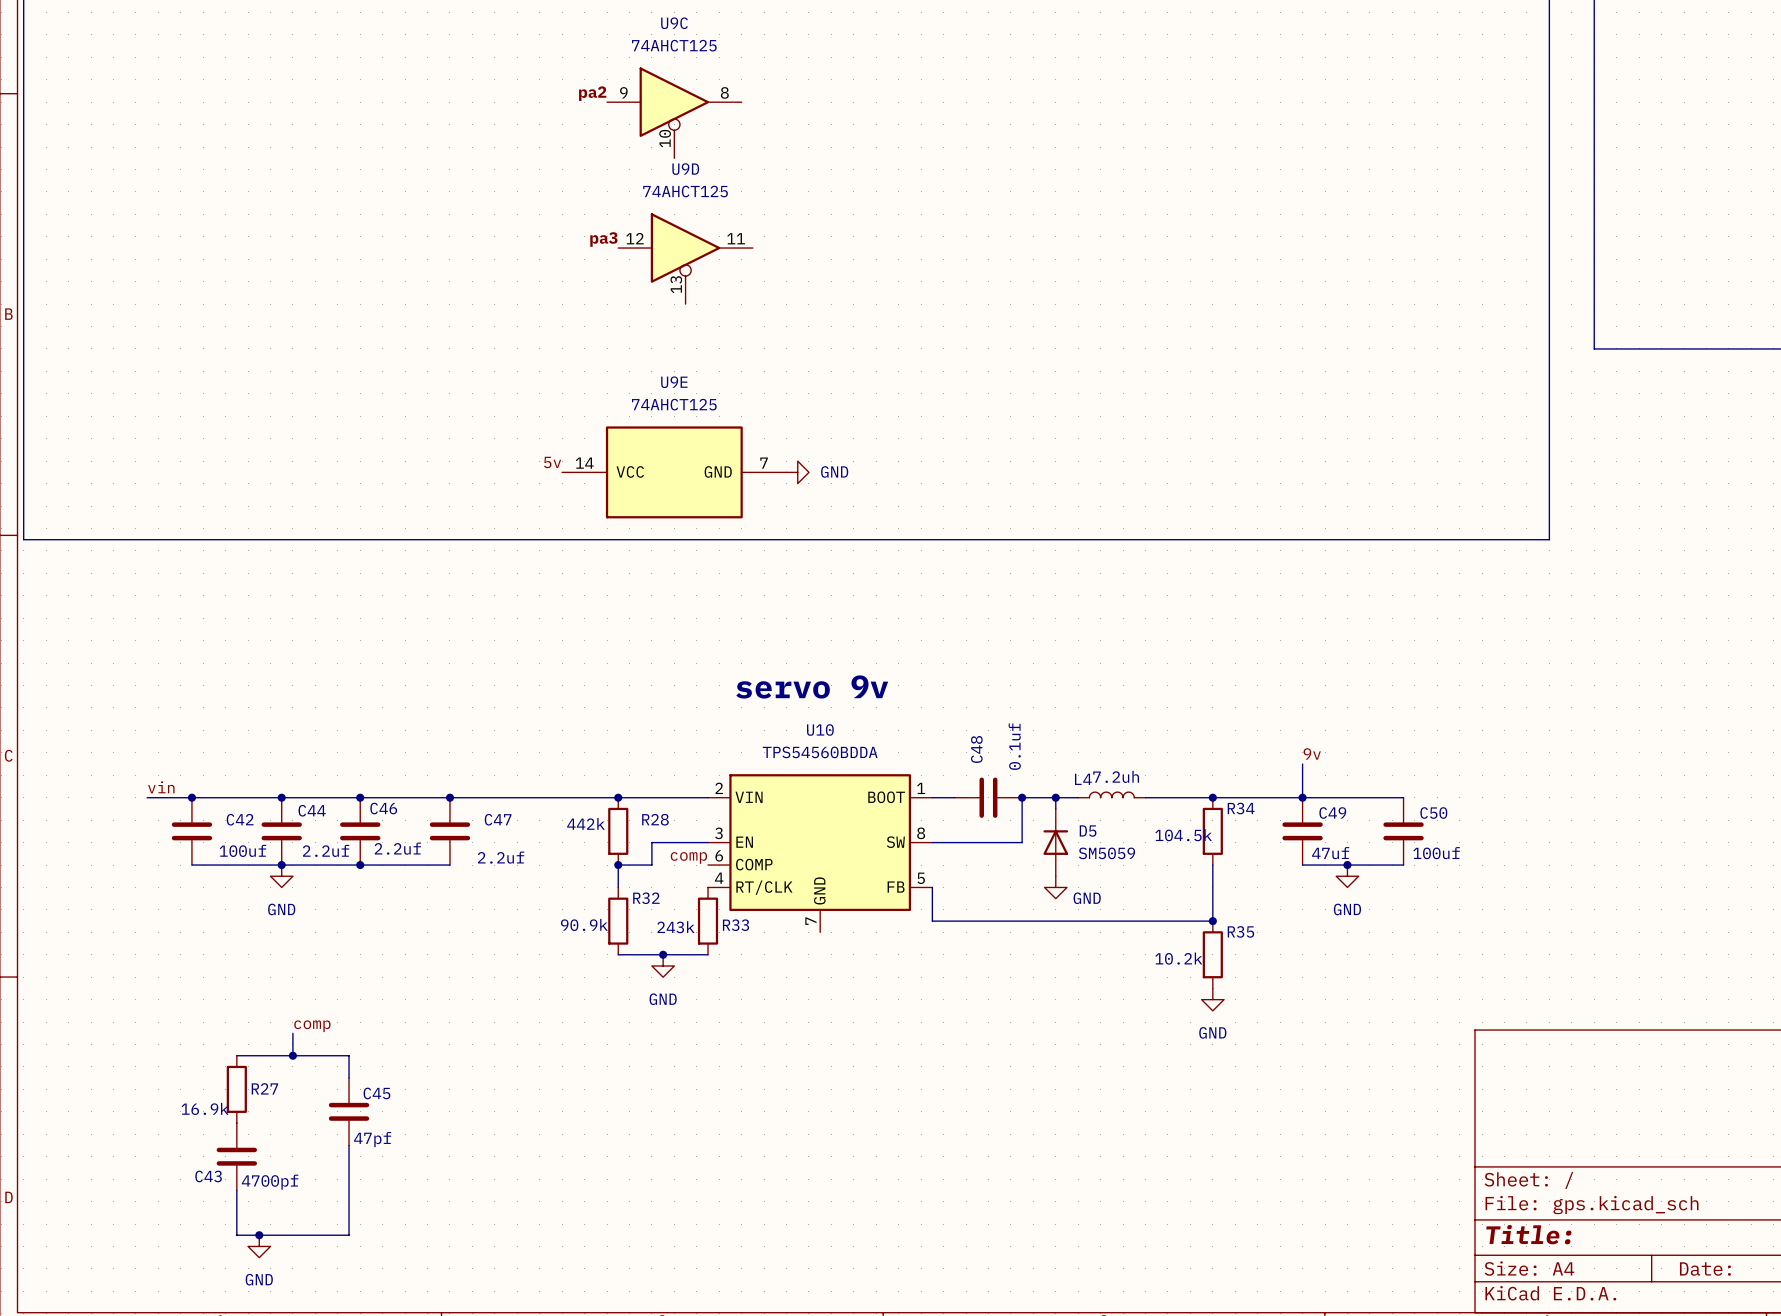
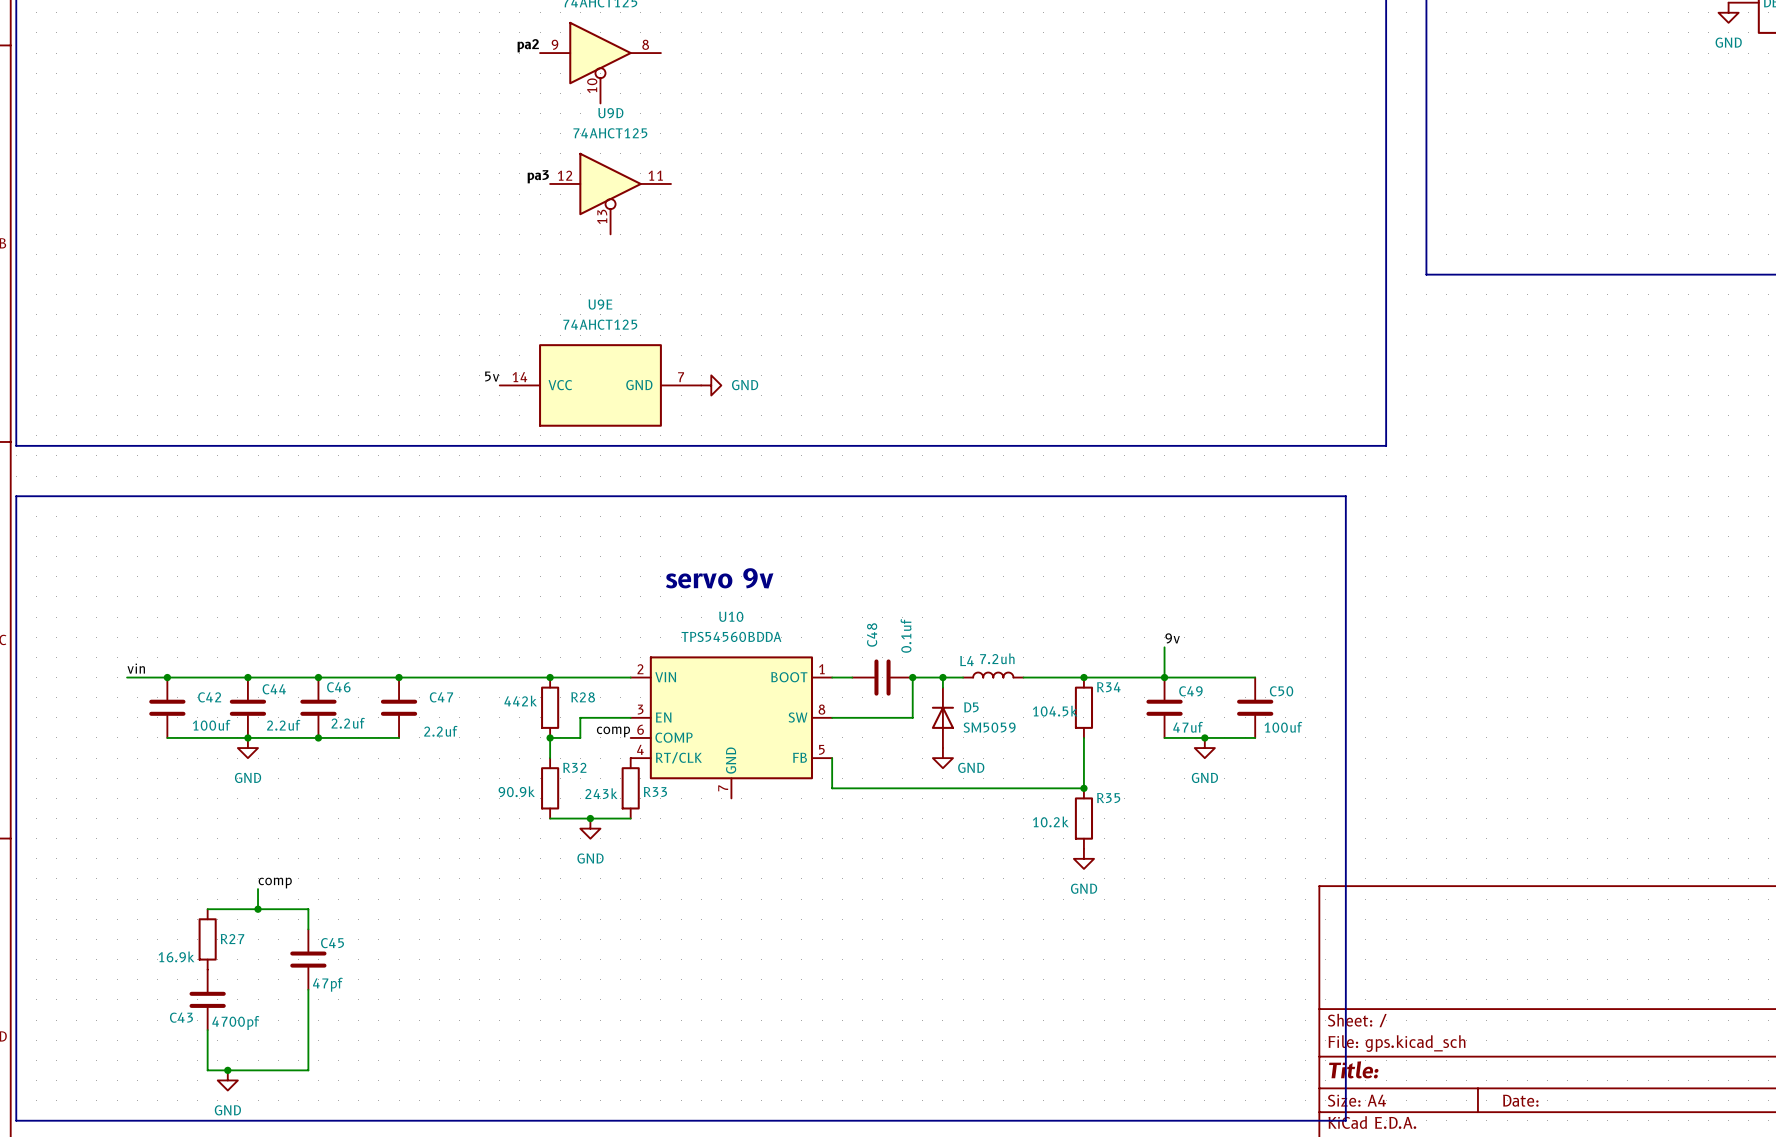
line: none -> (16, 496) (1345, 496) (1345, 1120) (16, 1120) (16, 496)

